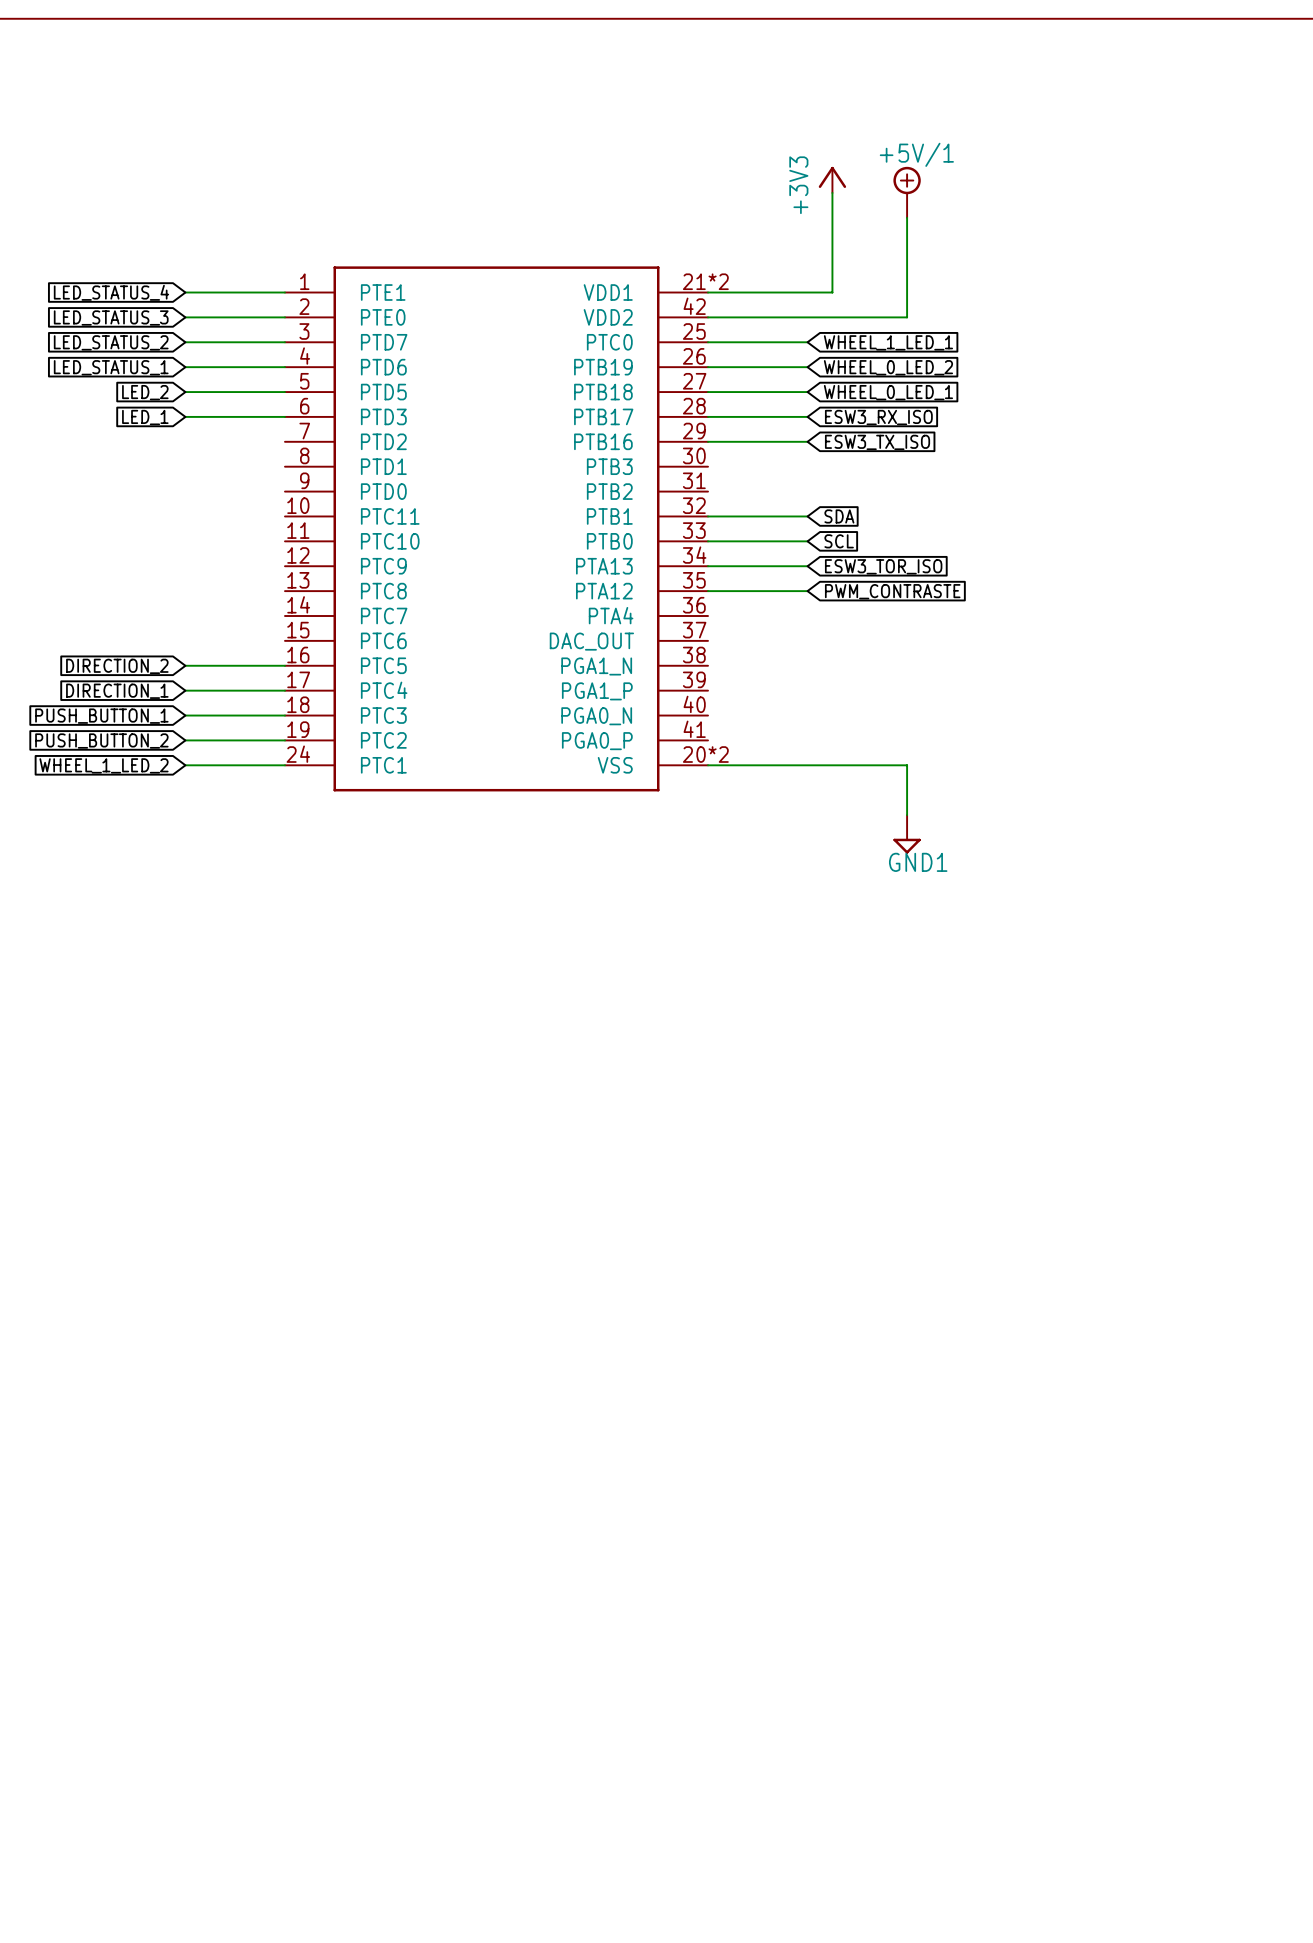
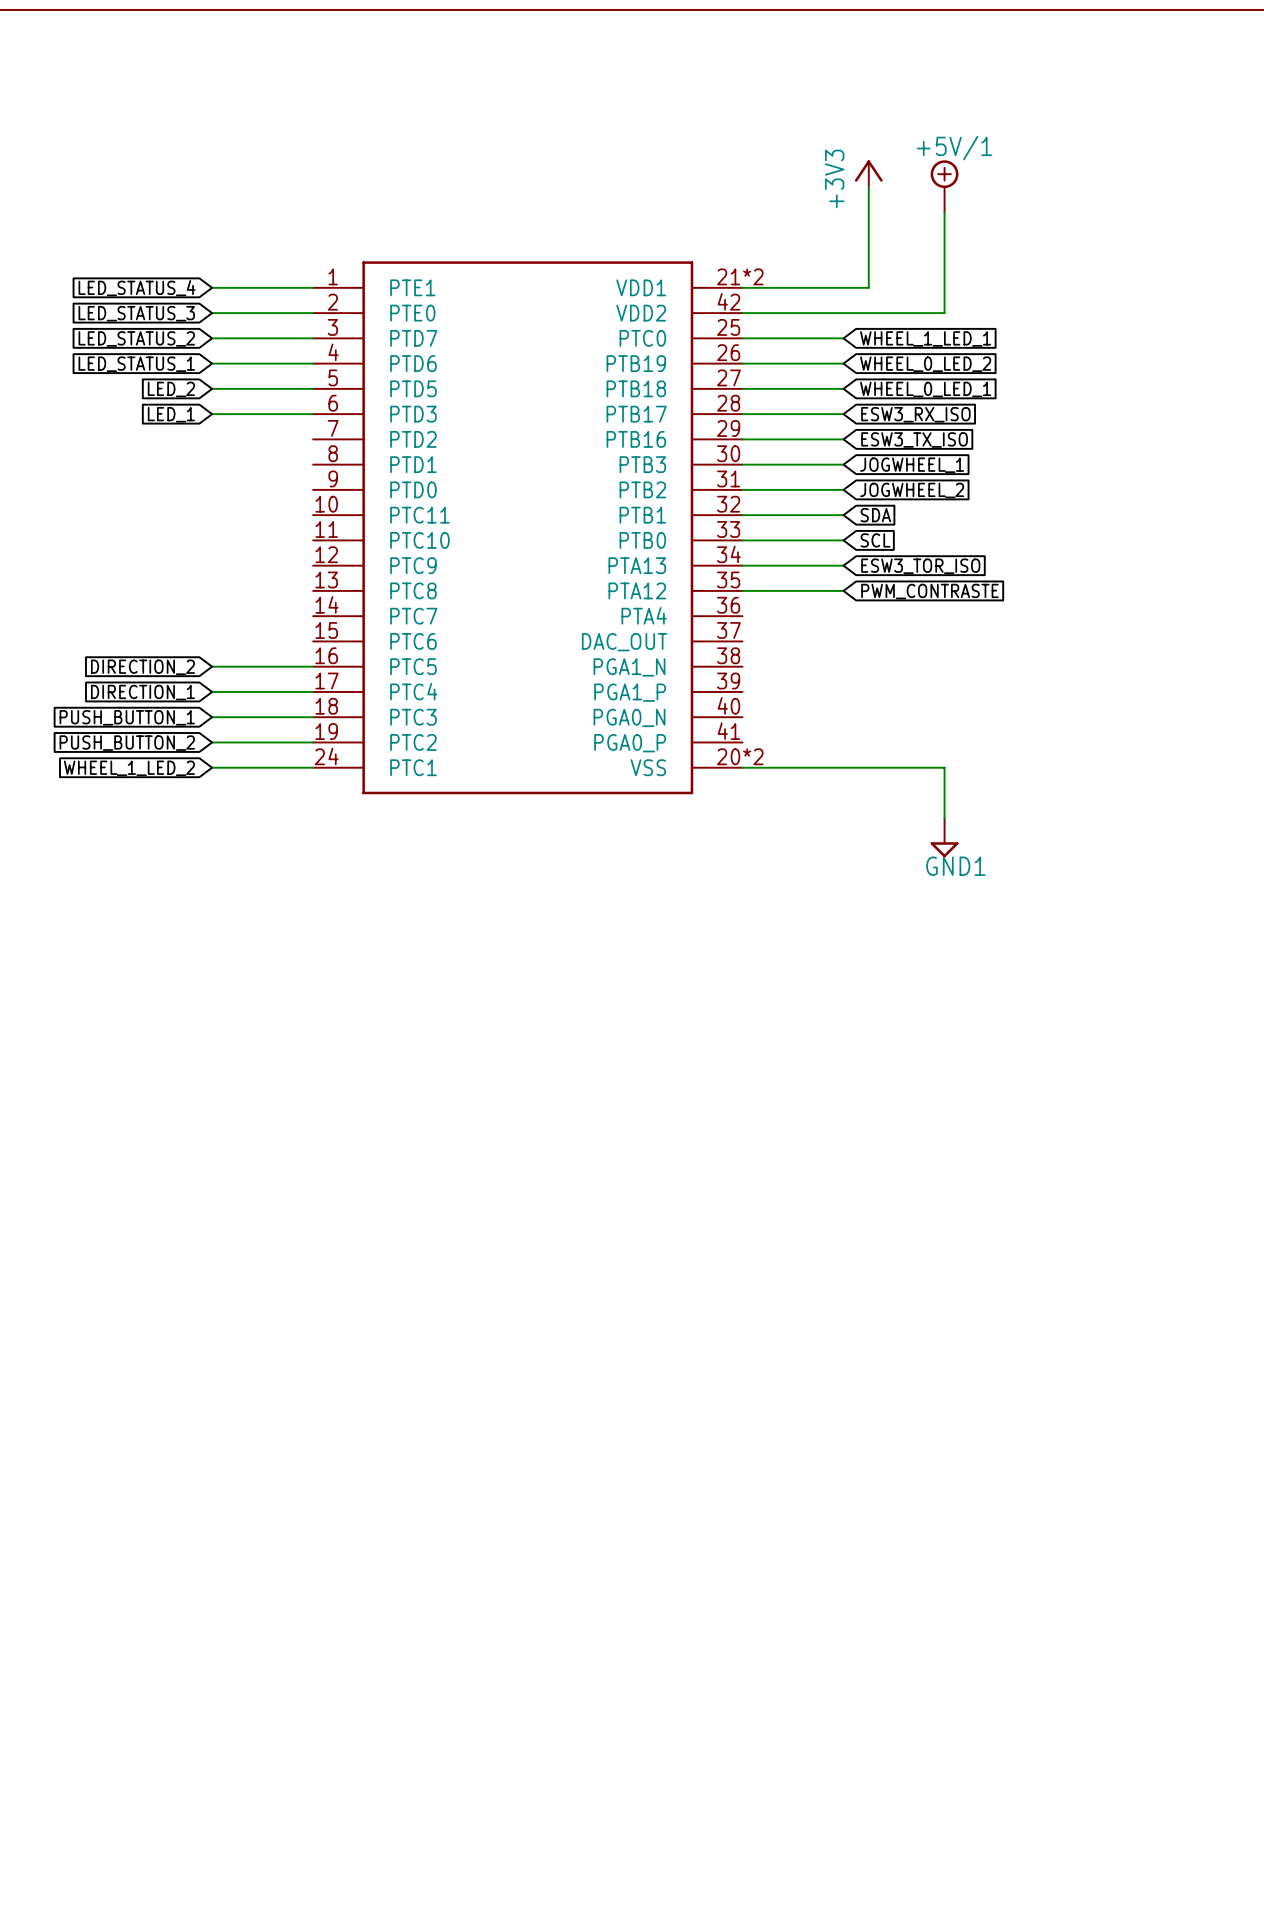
wire: none -> (742, 464) (843, 464)
global label: none -> JOGWHEEL_1 (912, 465)
wire: none -> (742, 489) (843, 489)
global label: none -> JOGWHEEL_2 (912, 490)

